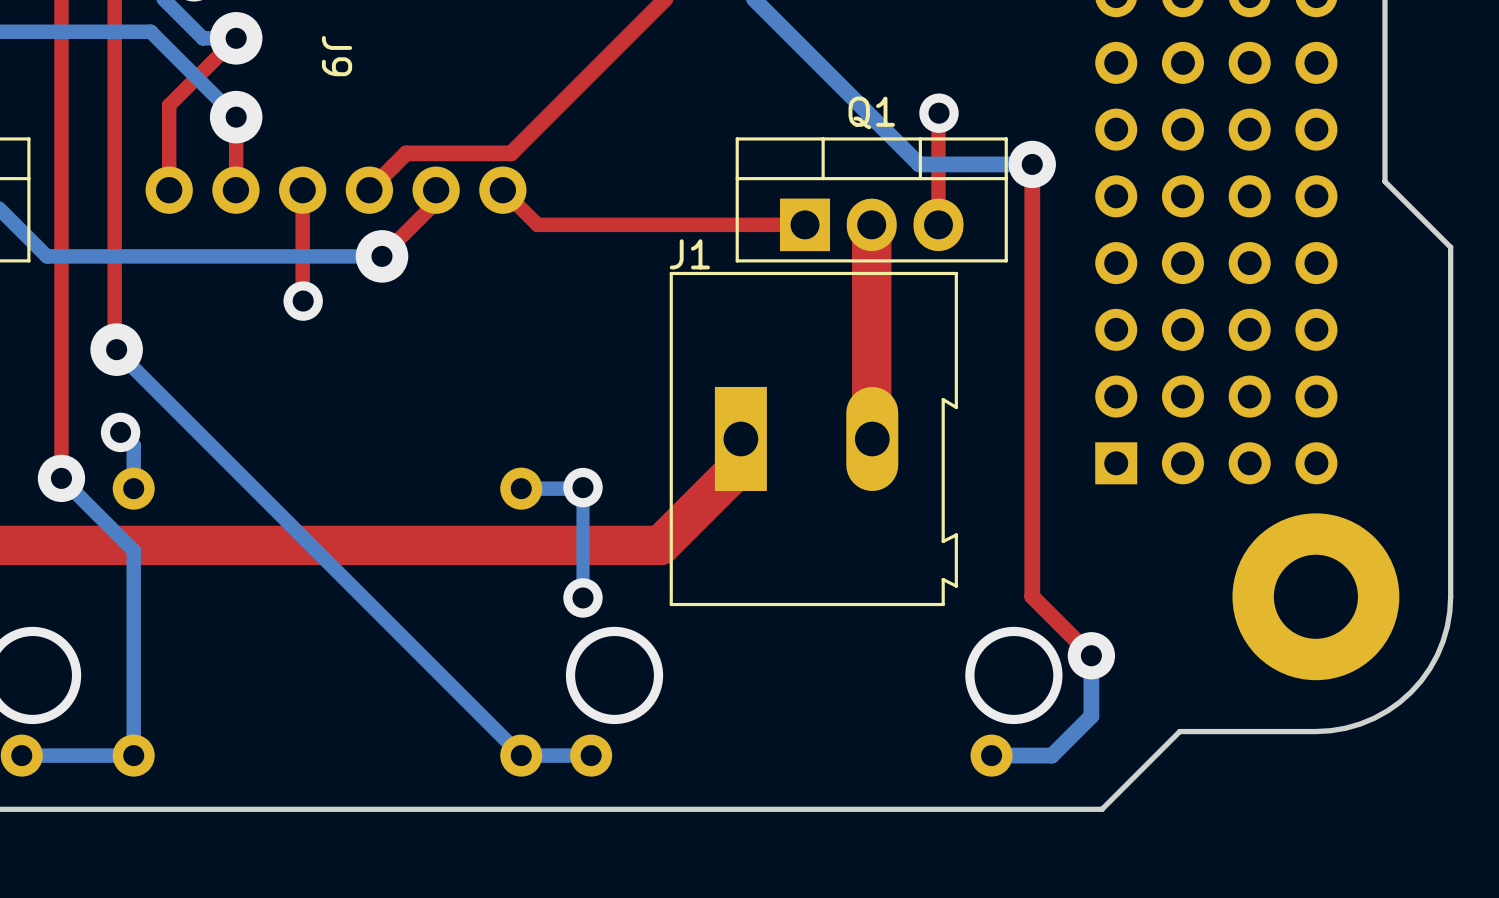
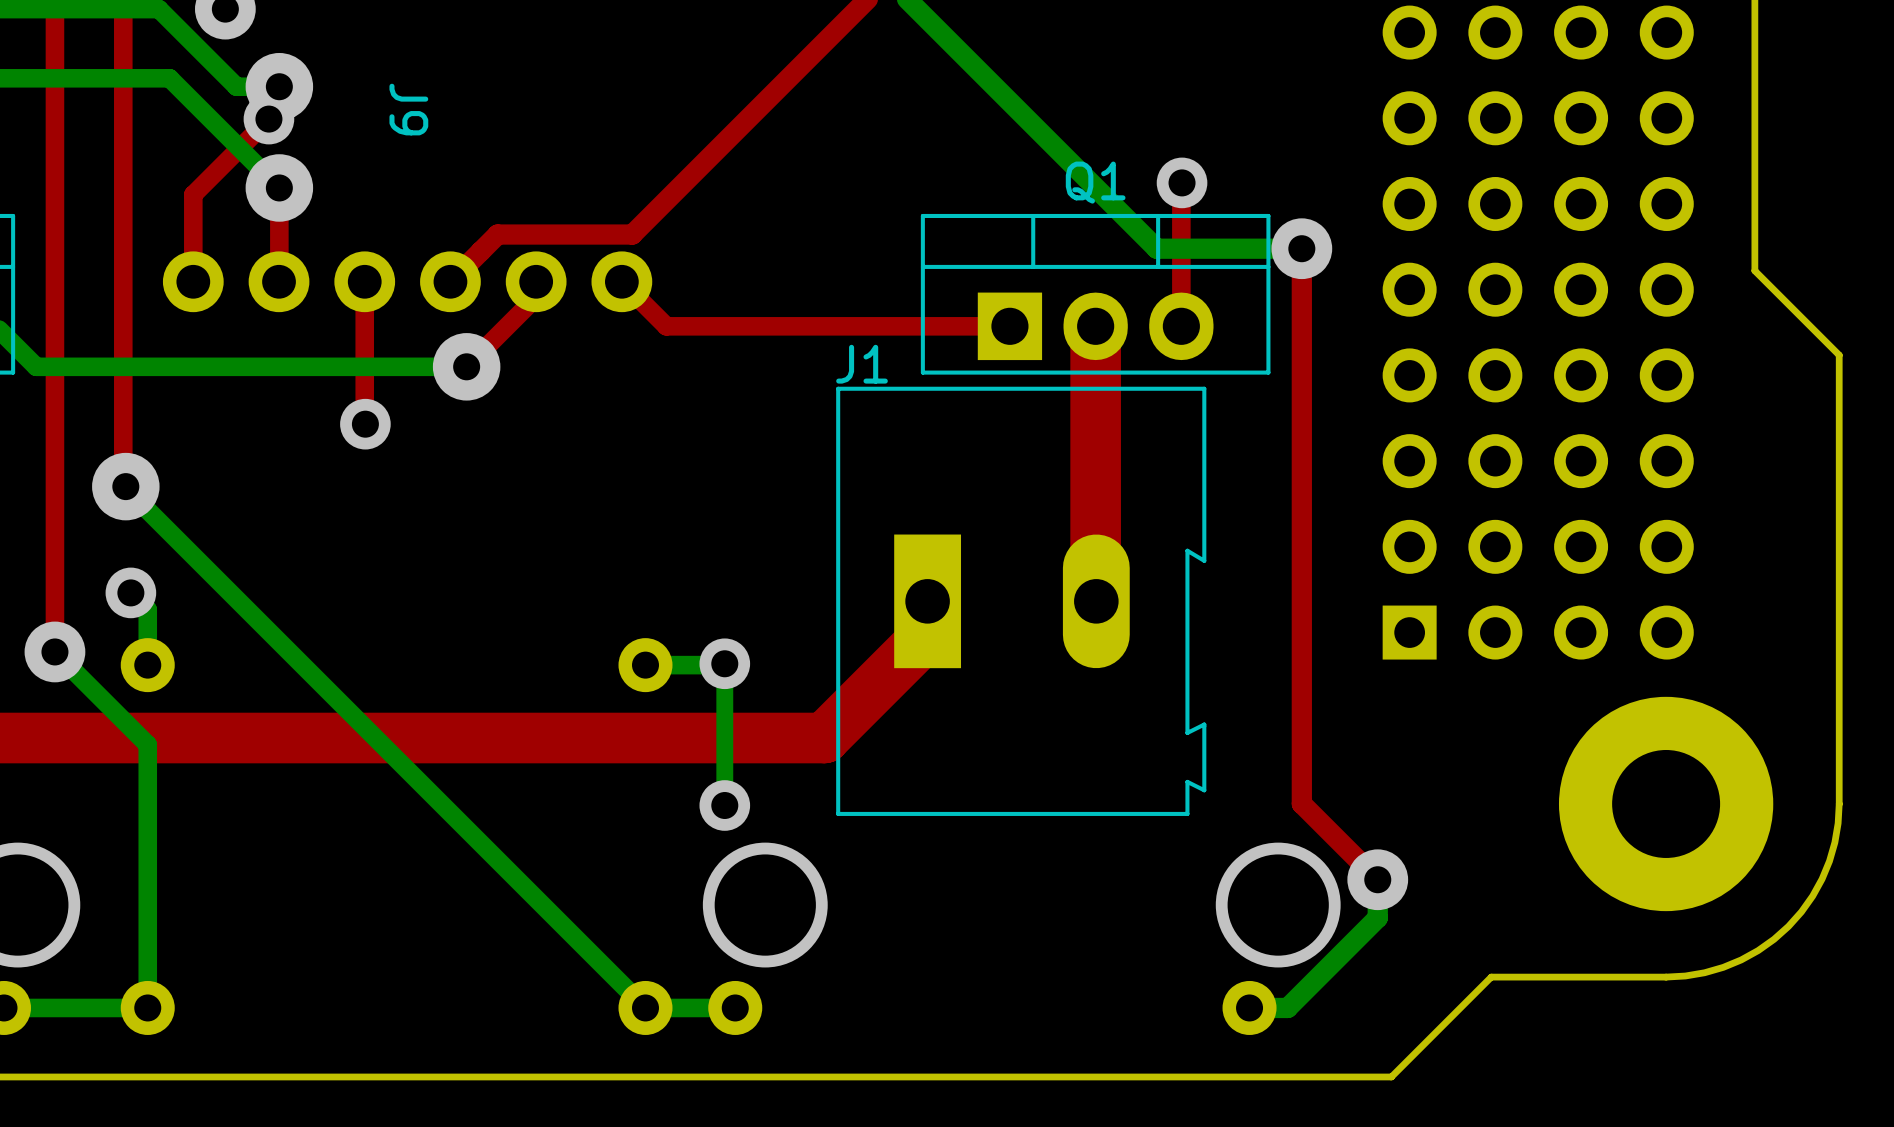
top track: (236, 38) (169, 105) (169, 122) -> (268, 119) (193, 194)
via: none -> (268, 119)
bottom track: (1091, 685) (1091, 716) (1051, 755) (1021, 755) -> (1377, 917) (1287, 1007)

